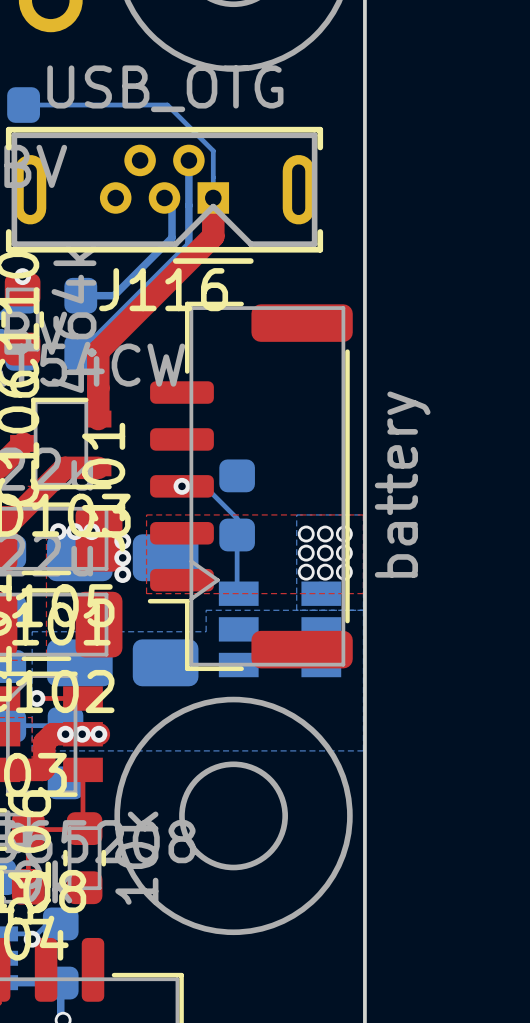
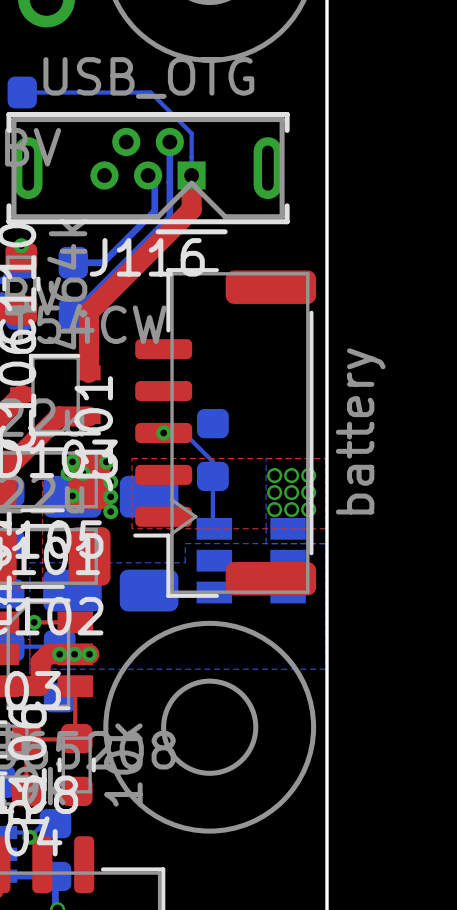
via: none -> (72, 461)
via: none -> (106, 461)
via: (58, 531) -> none
via: none -> (72, 495)

